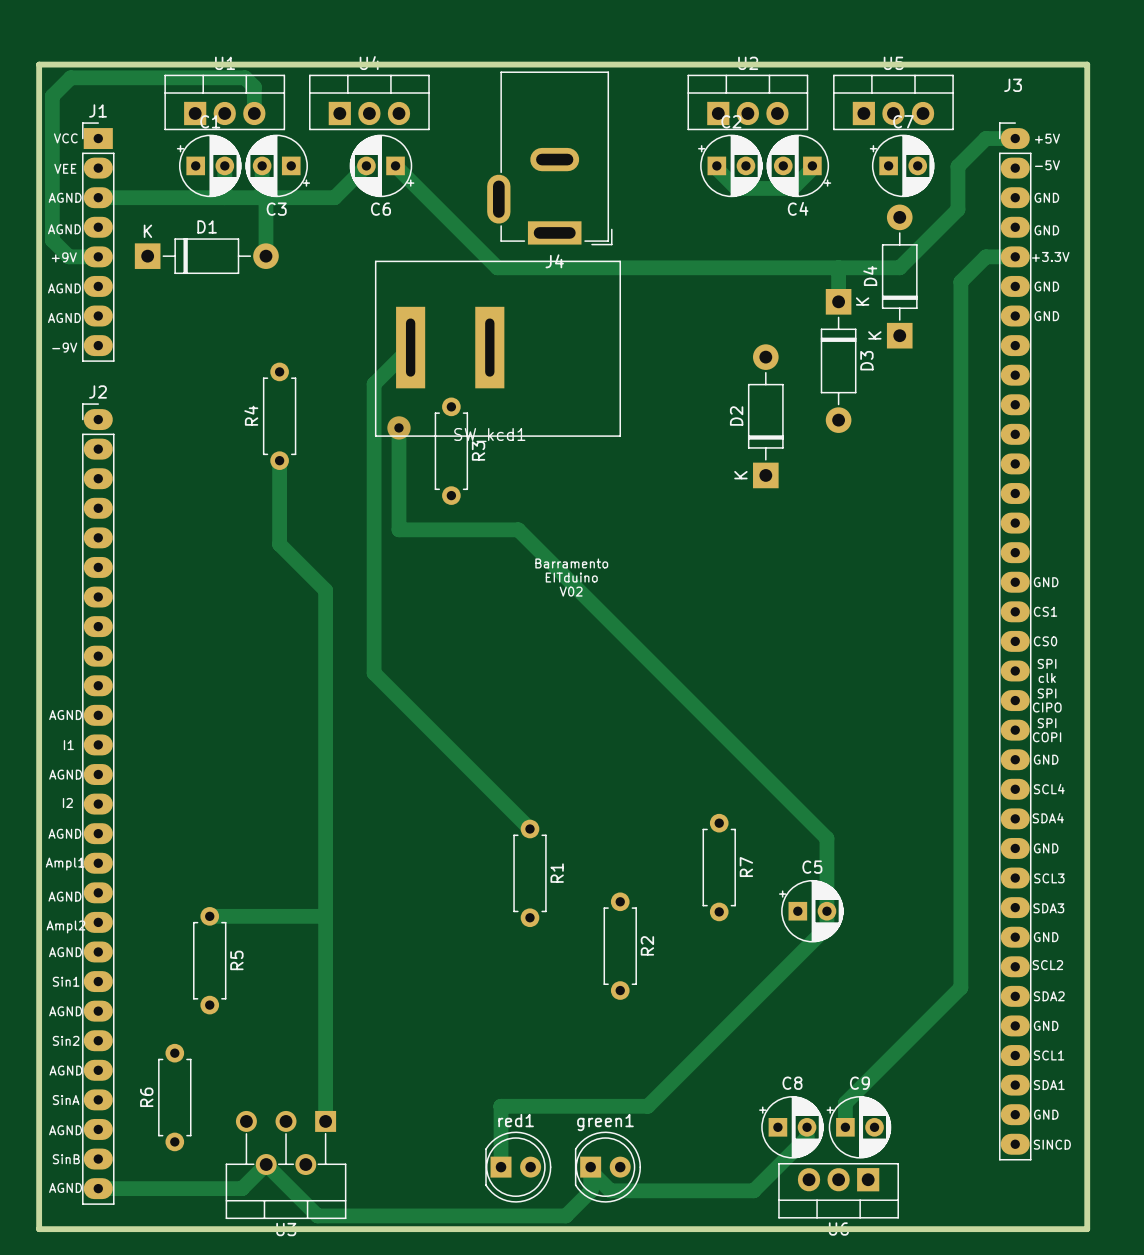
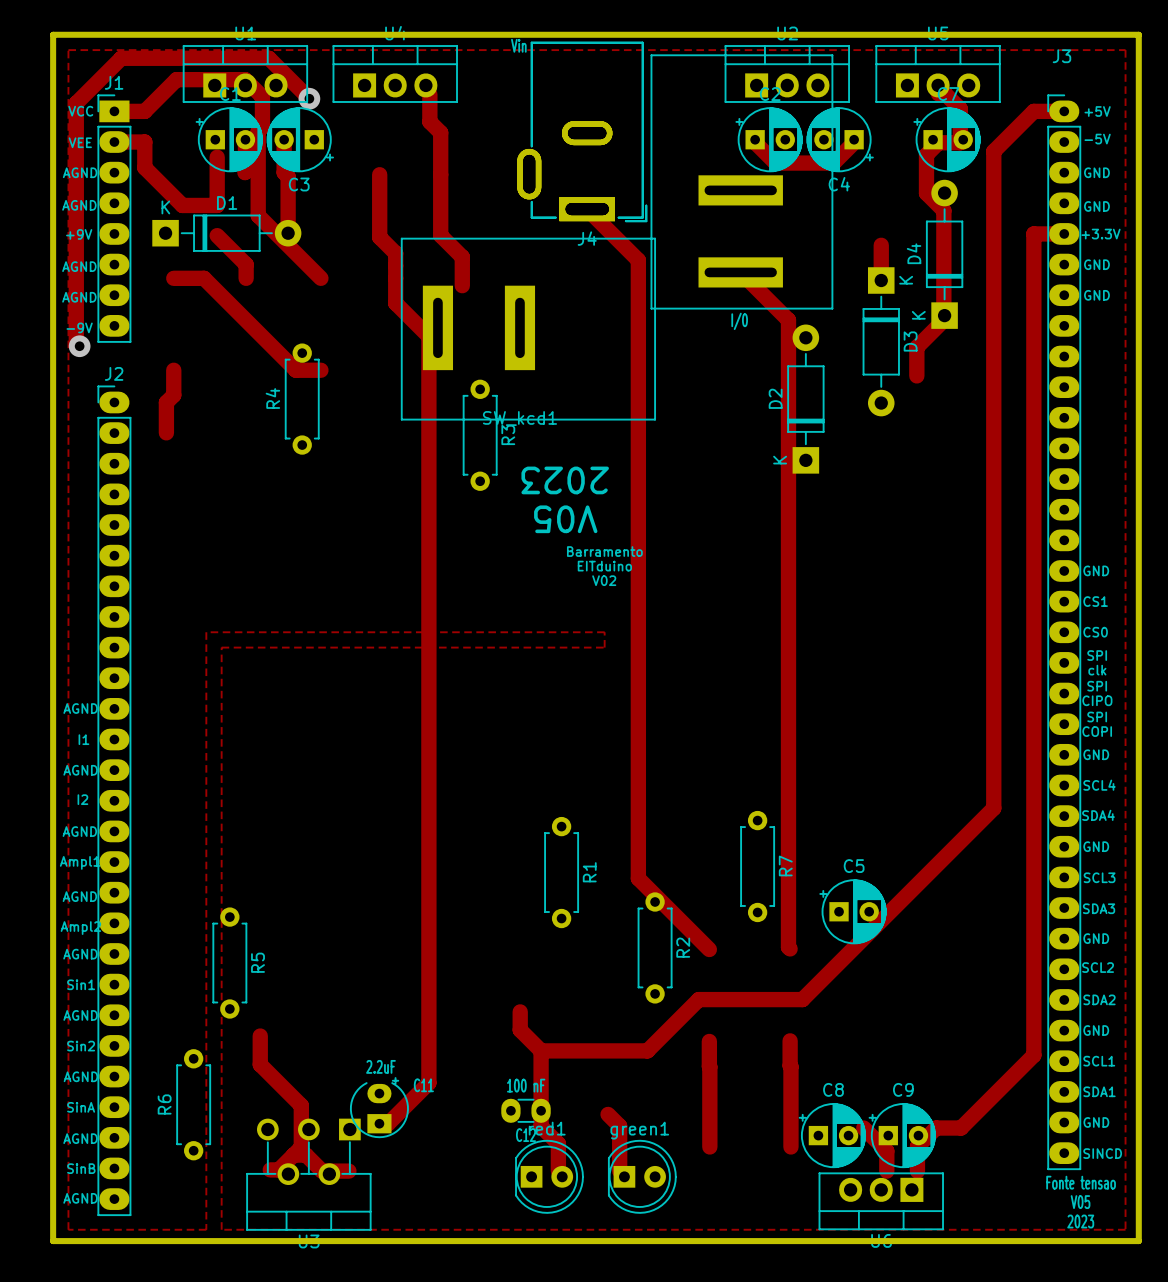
zone outline: none -> (68, 50) (68, 1229) (206, 1229) (206, 632) (604, 632) (604, 647) (221, 647) (221, 1229) (1125, 1229) (1125, 50) (68, 50)
track: (254, 113) (254, 87) (245, 77) (70, 77) (52, 96) (52, 240) (68, 256) (98, 256) -> none
track: none -> (938, 93) (945, 93) (960, 108) (960, 142) (938, 142) (926, 154) (926, 193) (943, 210) (943, 320) (916, 347) (916, 375)
track: none -> (429, 94) (429, 121) (440, 132) (440, 235) (462, 257) (462, 285)
track: none -> (309, 98) (268, 58) (121, 58) (76, 103) (76, 342) (79, 346)
via: none -> (309, 98)
track: none -> (114, 111) (144, 111) (176, 79) (245, 79) (262, 96) (262, 126) (258, 131) (258, 215) (320, 278)
Vin: none -> (582, 131)
track: (366, 165) (334, 197) (98, 197) -> none
C6: (382, 165) -> none
track: (395, 165) (497, 267) (899, 267) (957, 209) (957, 166) -> (541, 1050) (647, 1050) (698, 999) (802, 999) (993, 808) (993, 151) (1004, 140)
track: none -> (114, 142) (144, 142) (144, 167) (182, 205) (217, 205) (217, 157)
track: none -> (379, 174) (379, 237) (395, 253) (395, 303) (428, 336) (428, 1082) (388, 1123) (379, 1123)
I/0: none -> (741, 181)
track: none -> (587, 209) (638, 260) (638, 878) (709, 949)
track: (985, 256) (960, 281) (960, 987) (845, 1103) (845, 1127) -> (1033, 233) (1033, 1055) (961, 1128) (936, 1128) (917, 1146) (917, 1171)
track: none -> (217, 235) (246, 264) (246, 278)
track: none -> (740, 272) (788, 320) (788, 947) (790, 948)
track: none -> (173, 278) (204, 278) (295, 370) (320, 370)
track: (410, 347) (374, 384) (374, 673) (529, 829) -> none
via: none -> (79, 346)
track: none -> (173, 370) (173, 395) (166, 402) (166, 432)
track: (398, 427) (398, 529) (518, 529) (826, 838) (826, 927) (647, 1106) (500, 1106) -> none
via: (398, 427) -> none
track: (279, 460) (279, 544) (325, 590) (325, 1121) -> none
text: none -> 2023 (565, 480)
text: none -> V05 (565, 519)
track: (325, 914) (323, 916) (209, 916) -> none
track: none -> (520, 1011) (520, 1030) (541, 1050)
track: none -> (260, 1036) (260, 1064) (301, 1105) (301, 1147) (278, 1169) (270, 1169)
track: none -> (790, 1040) (790, 1146)
track: none -> (709, 1041) (709, 1146)
track: none -> (541, 1050) (541, 1126) (558, 1143) (558, 1171)
C11: none -> 2.2uF (379, 1107)
C12: none -> 100 nF (526, 1110)
track: (501, 1106) (501, 1167) -> none
track: none -> (608, 1114) (619, 1126) (619, 1171)
track: none -> (863, 1128) (886, 1151) (886, 1171)
track: (807, 1127) (807, 1137) (753, 1190) (610, 1190) (590, 1171) -> none
track: none -> (293, 1155) (306, 1155) (322, 1171) (348, 1171)
track: (590, 1167) (591, 1190) (565, 1215) (317, 1215) (266, 1164) (242, 1188) (98, 1188) -> none
text: none -> Fonte tensao (1081, 1182)
text: none -> V05 (1080, 1202)
text: none -> 2023 (1080, 1221)

